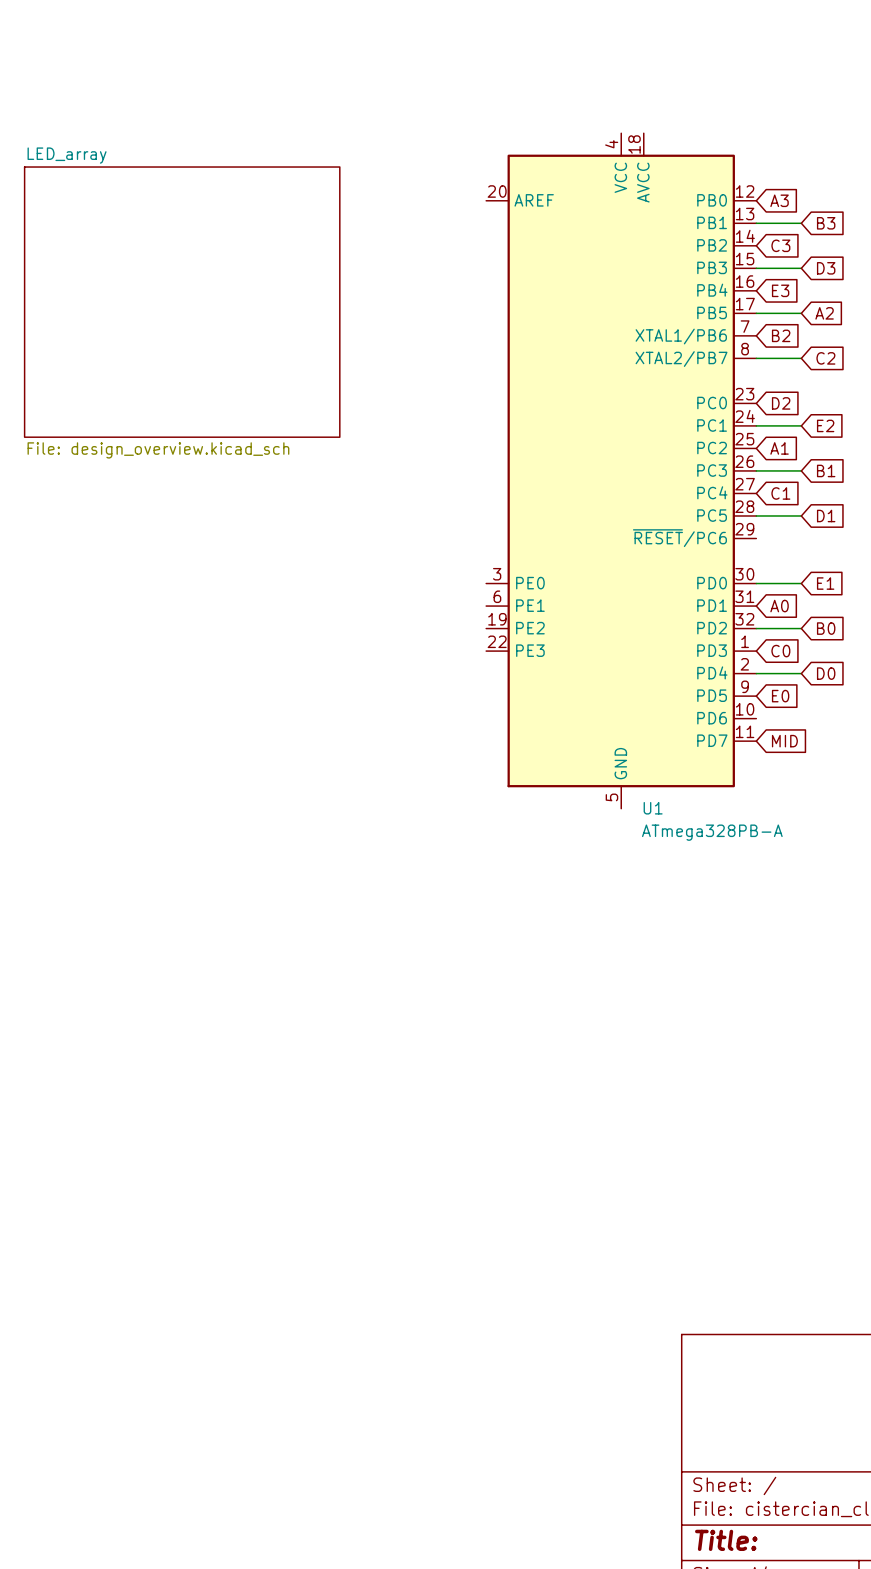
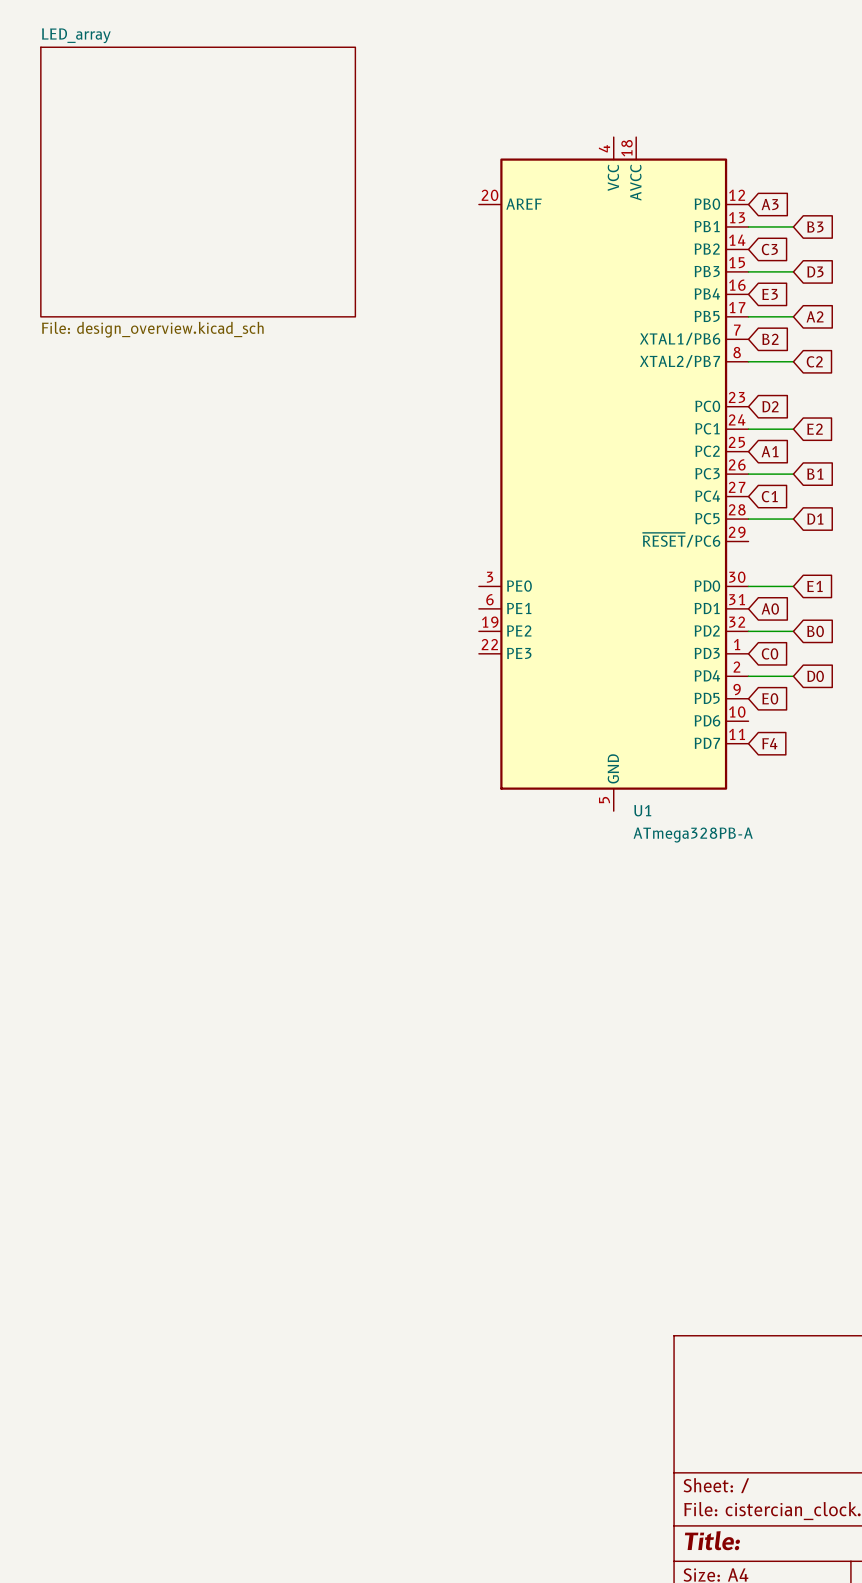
sheet LED_array position: (182, 302) -> (198, 182)
global label: MID (784, 741) -> F4 (769, 743)

